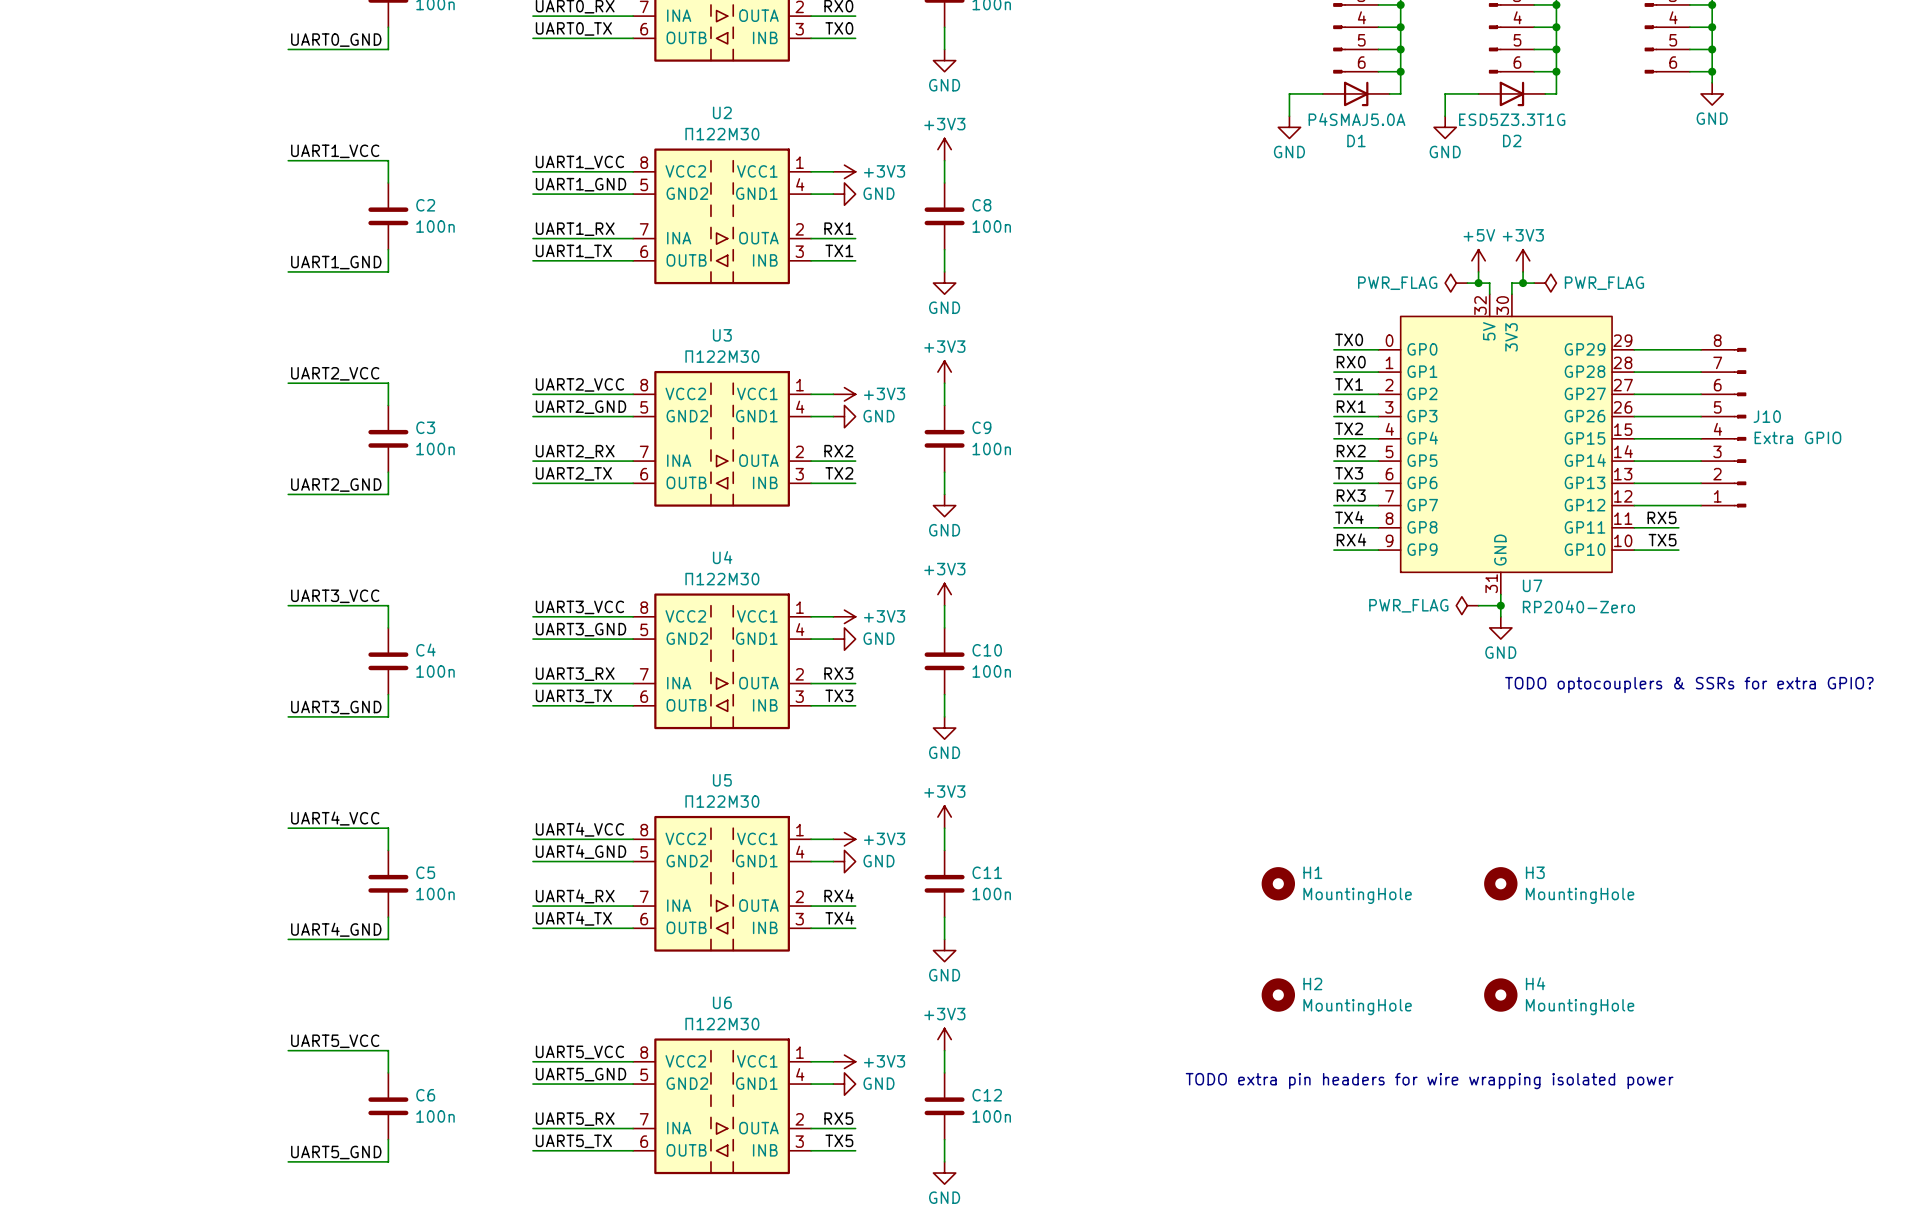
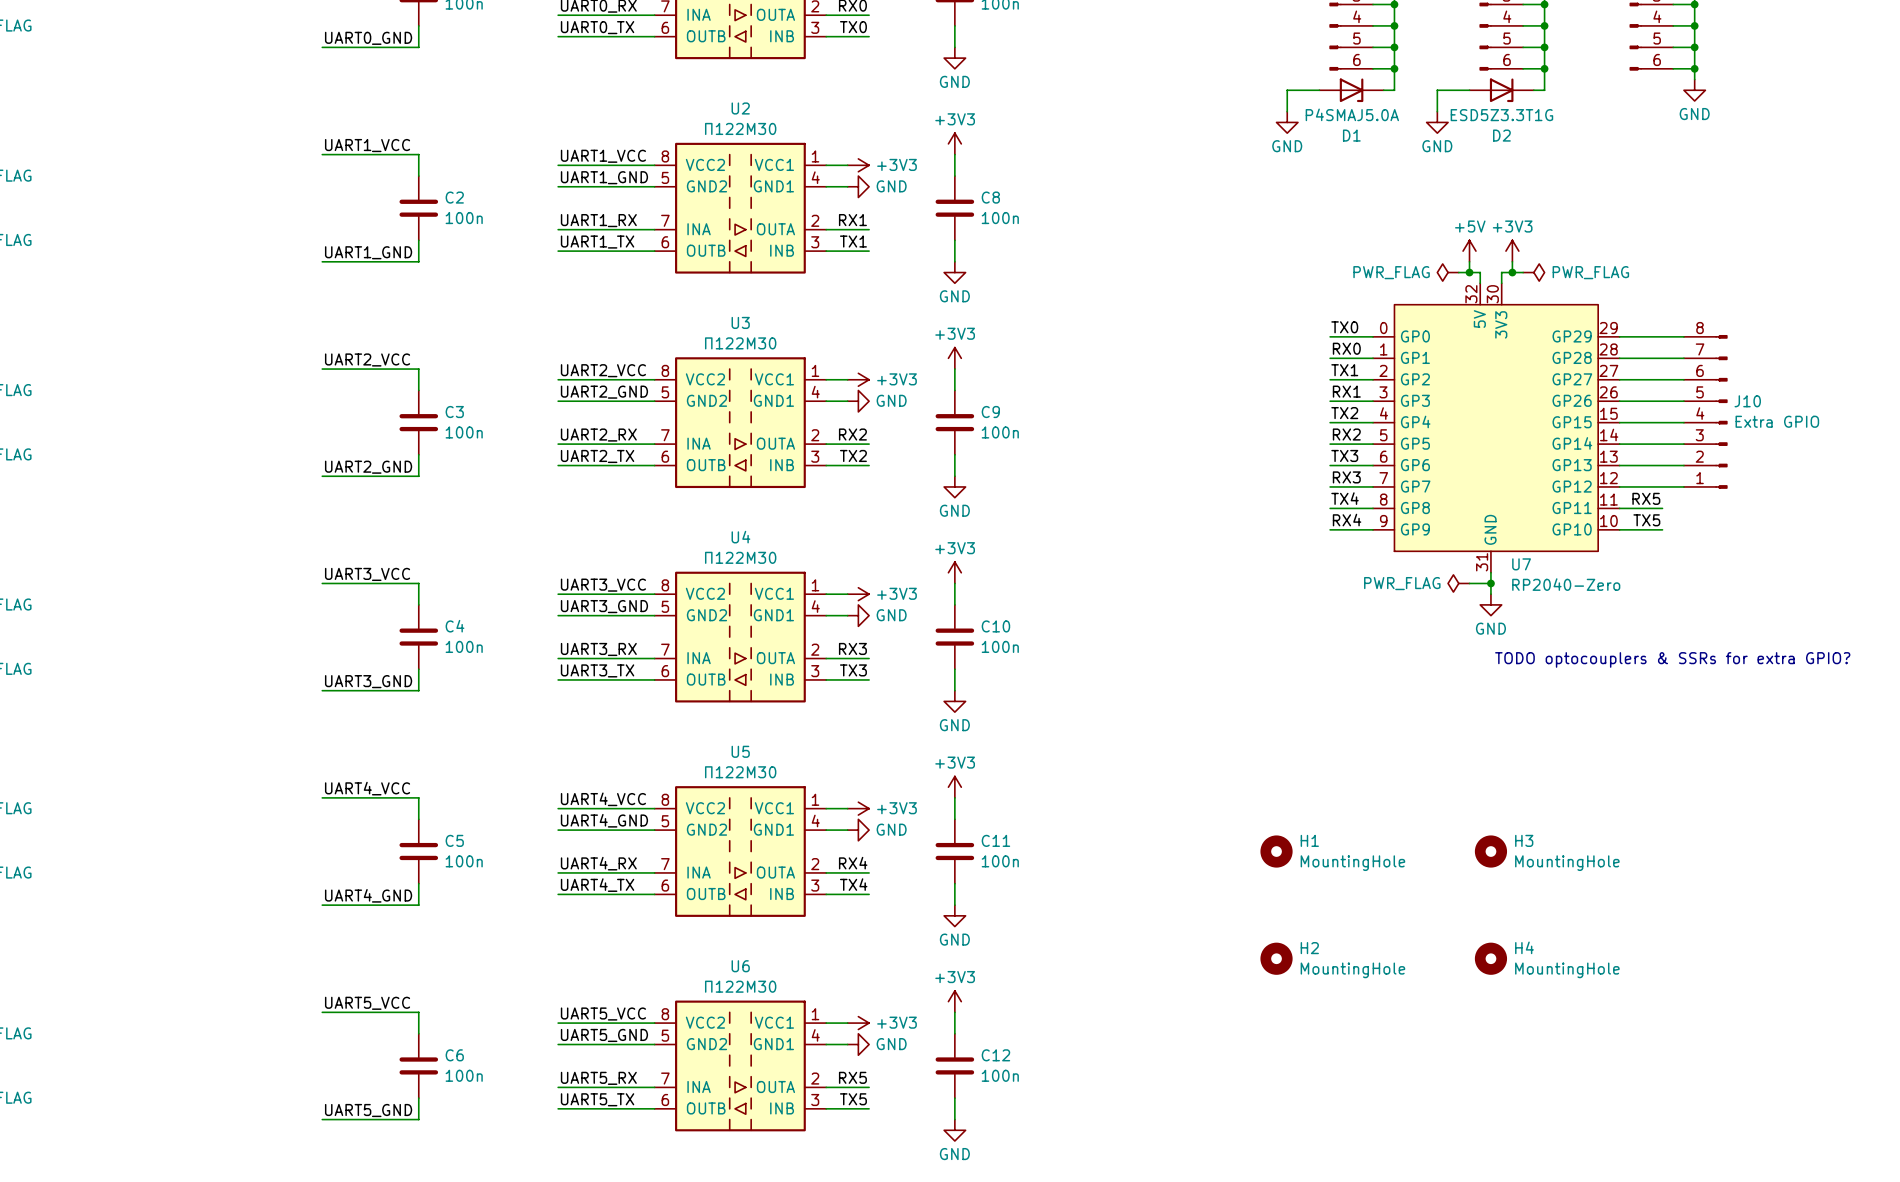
text: TODO extra pin headers for wire wrapping isolated power (1429, 1081) -> none

